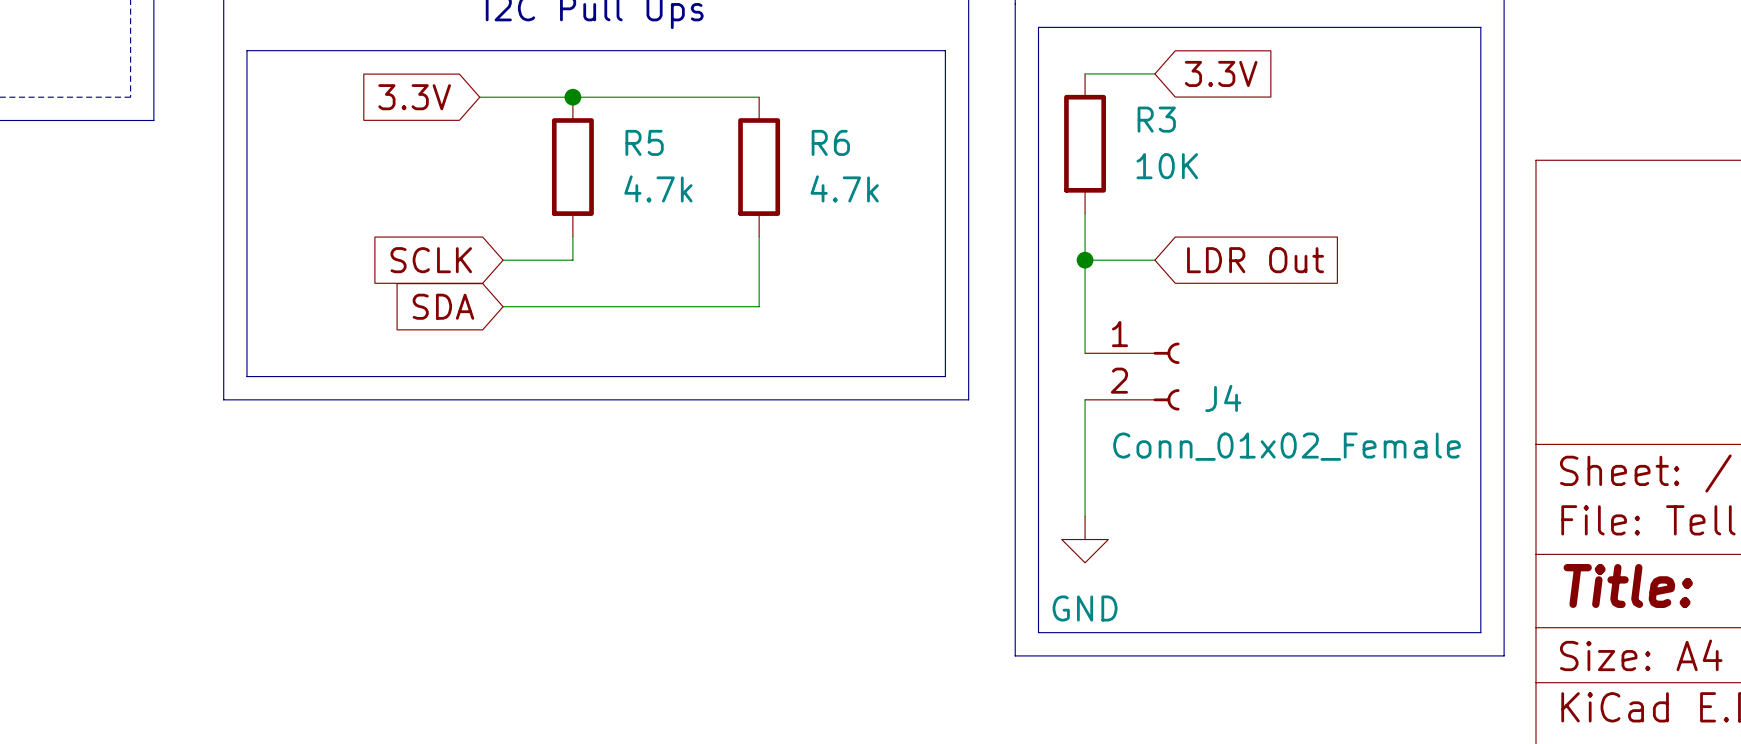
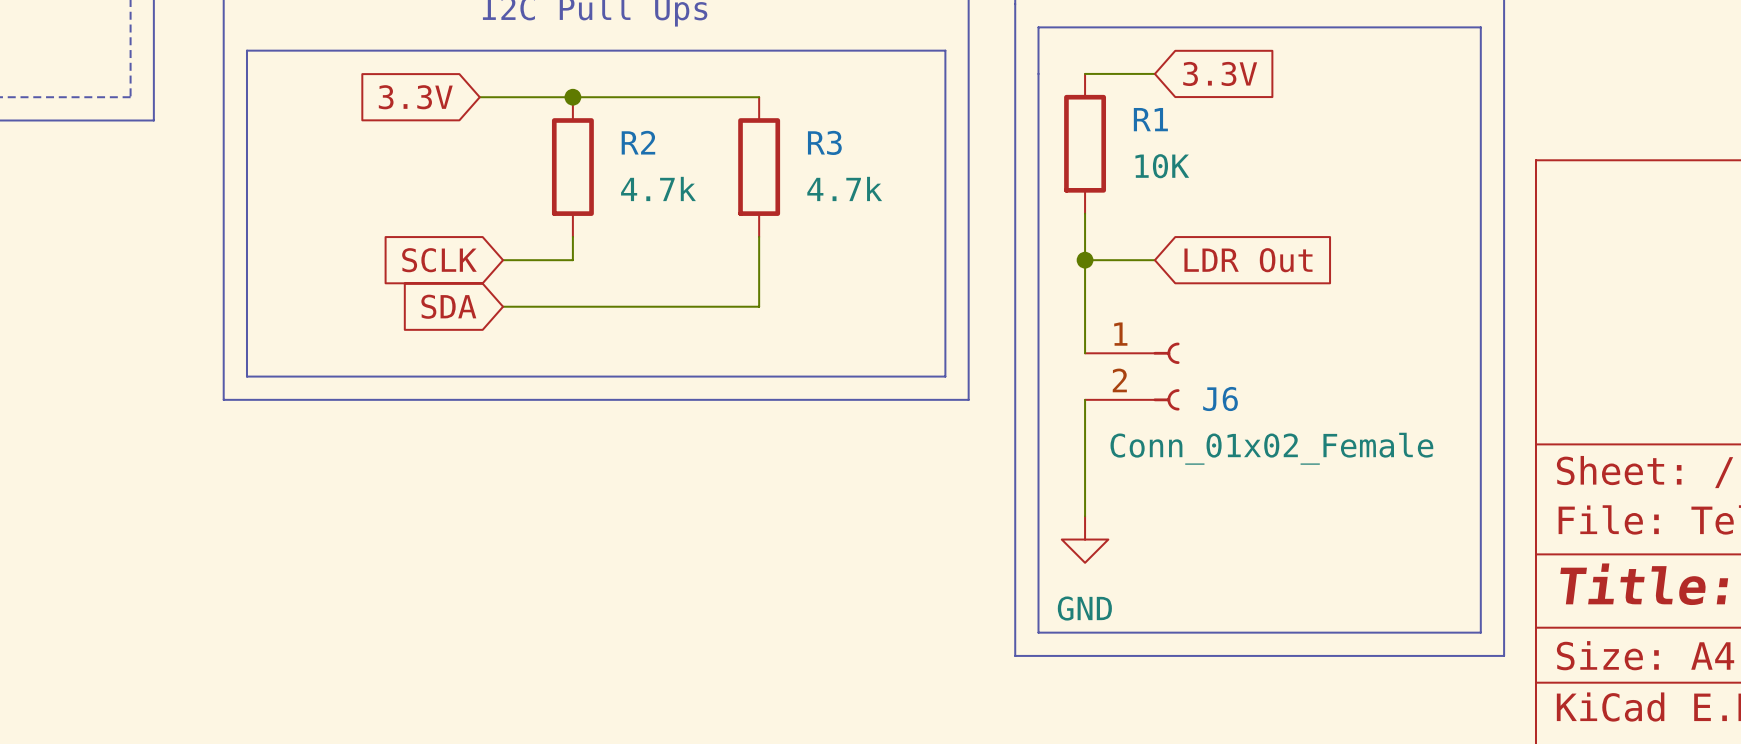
R3 name: R3 (1156, 119) -> R1 (1150, 119)
R5 name: R5 (644, 142) -> R2 (638, 142)
R6 name: R6 (830, 142) -> R3 (824, 142)
J4 name: J4 (1223, 398) -> J6 (1220, 399)

